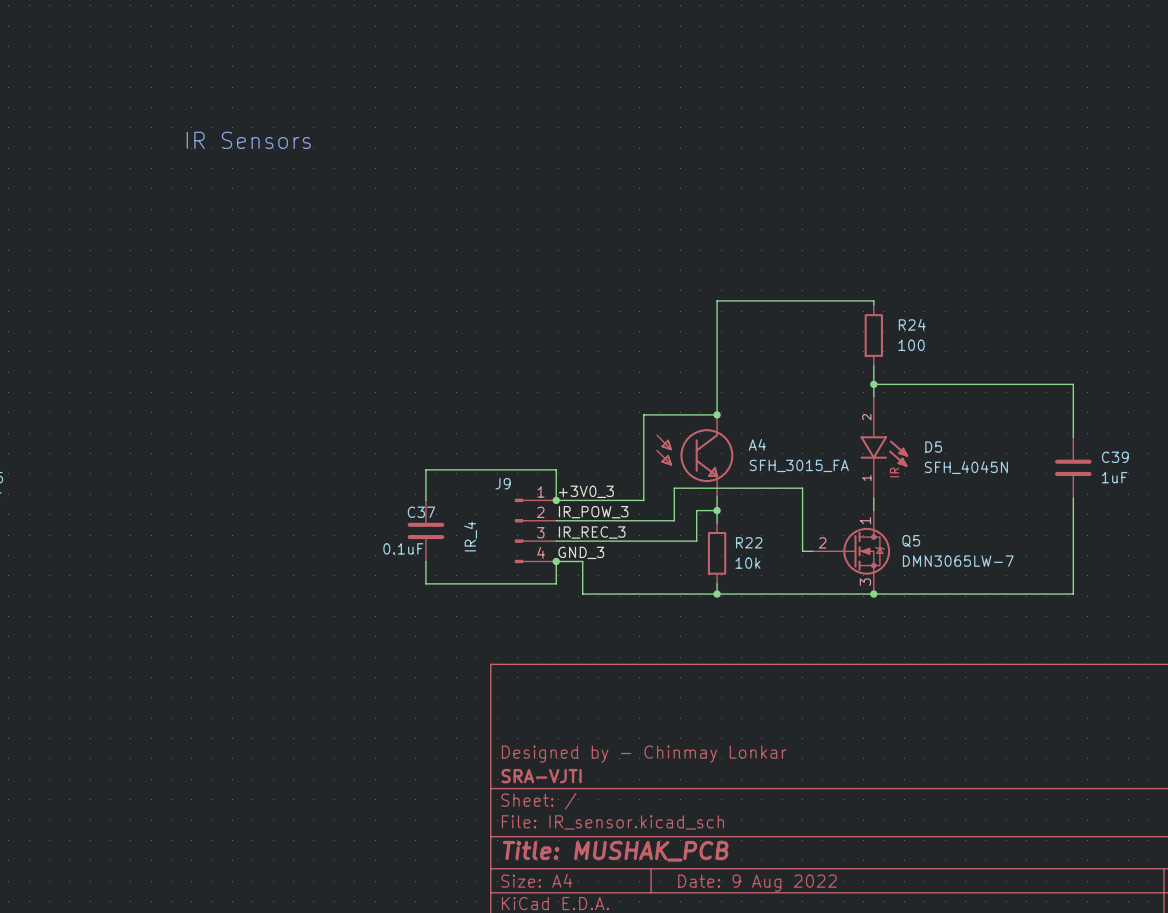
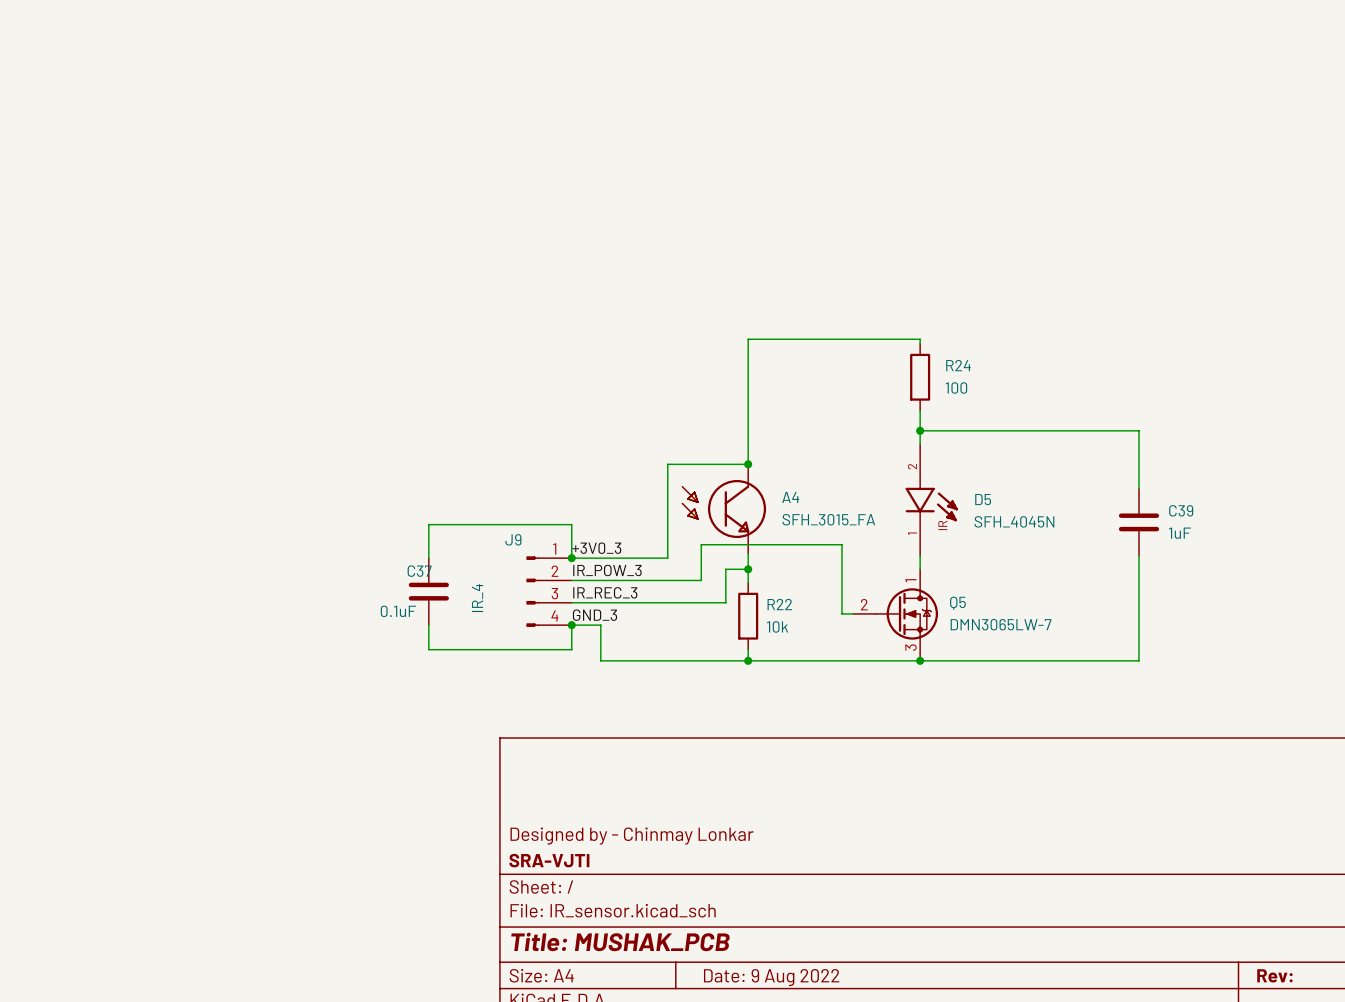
text: IR Sensors (248, 140) -> none

